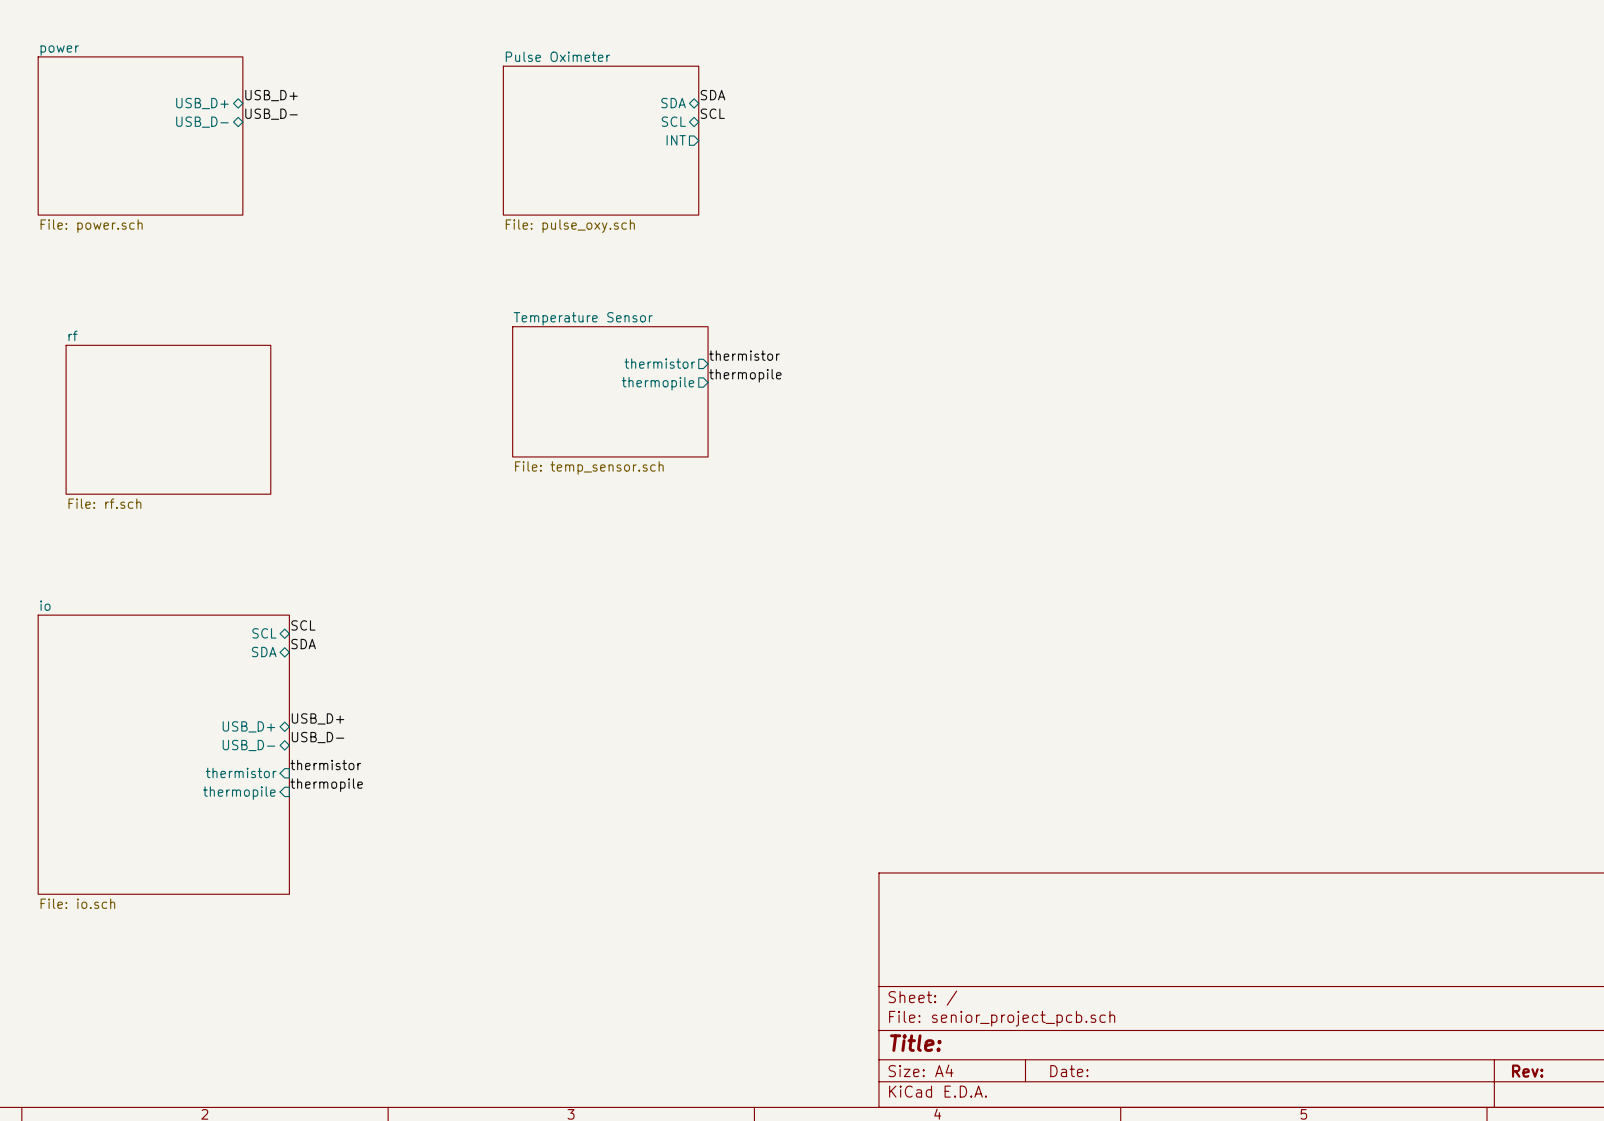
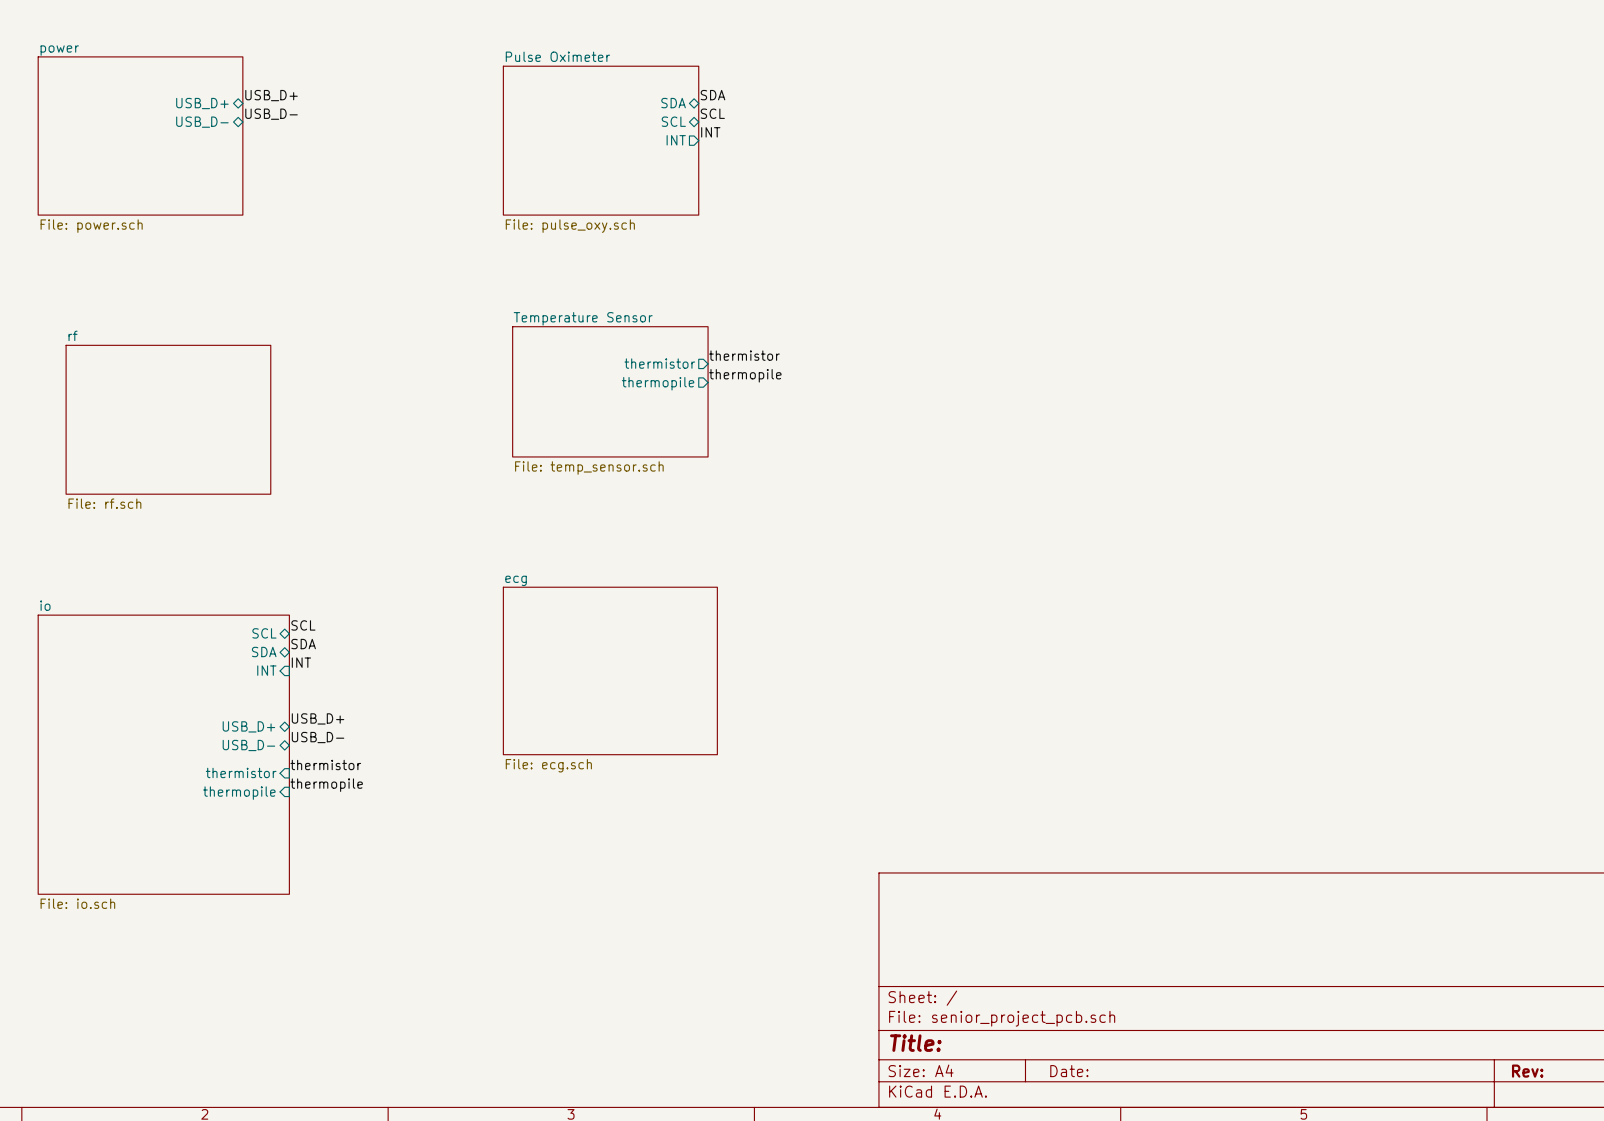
label: none -> INT (710, 132)
label: none -> INT (301, 662)
sheet pin: none -> INT (266, 670)
sheet ecg: none -> File: ecg.sch (610, 670)

